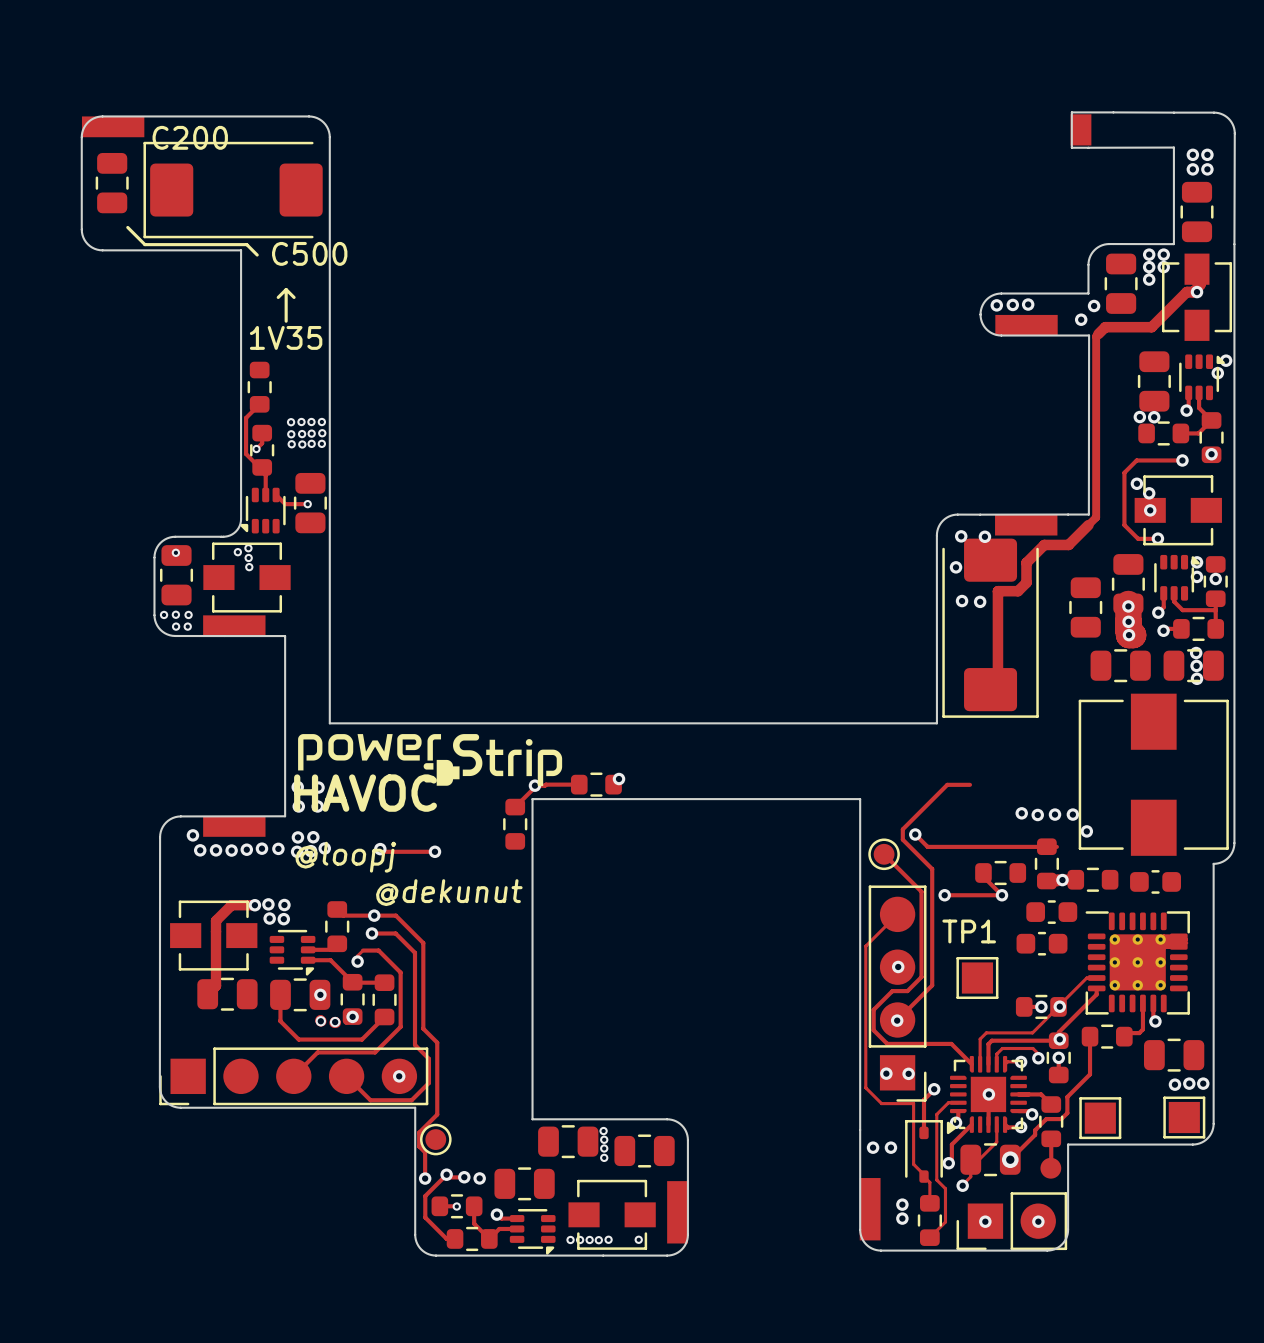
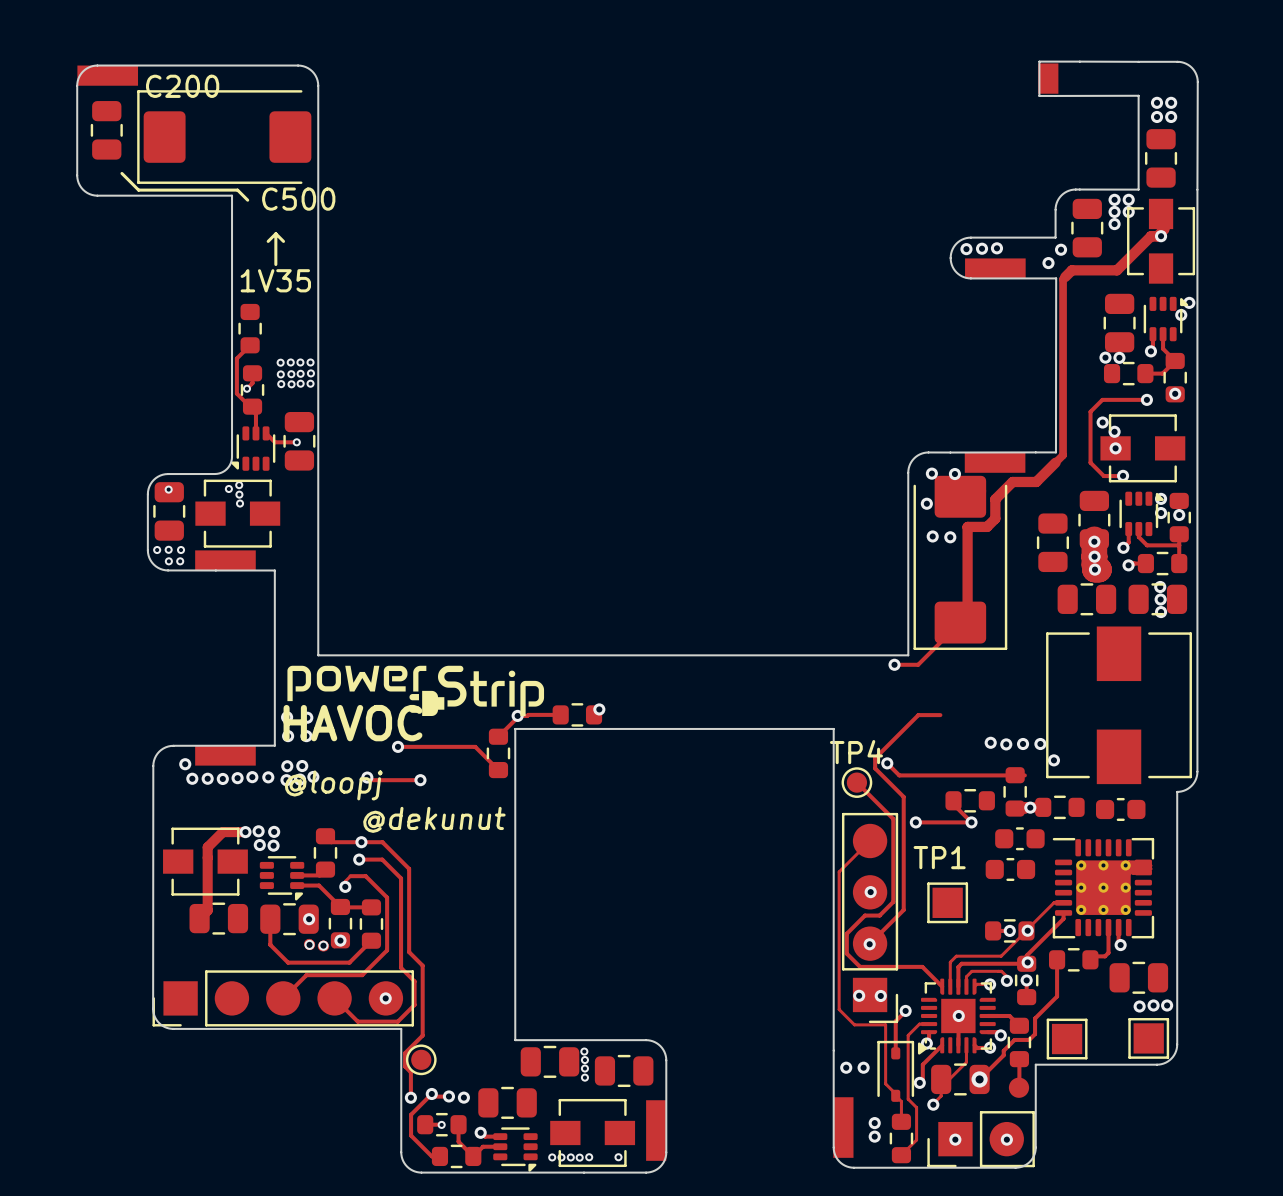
track: none -> (960, 622) (918, 664) (894, 664)
via: none -> (894, 664)
track: none -> (398, 746) (475, 746) (498, 770)
via: none -> (398, 746)
TP4 name: none -> TP4 (856, 752)

